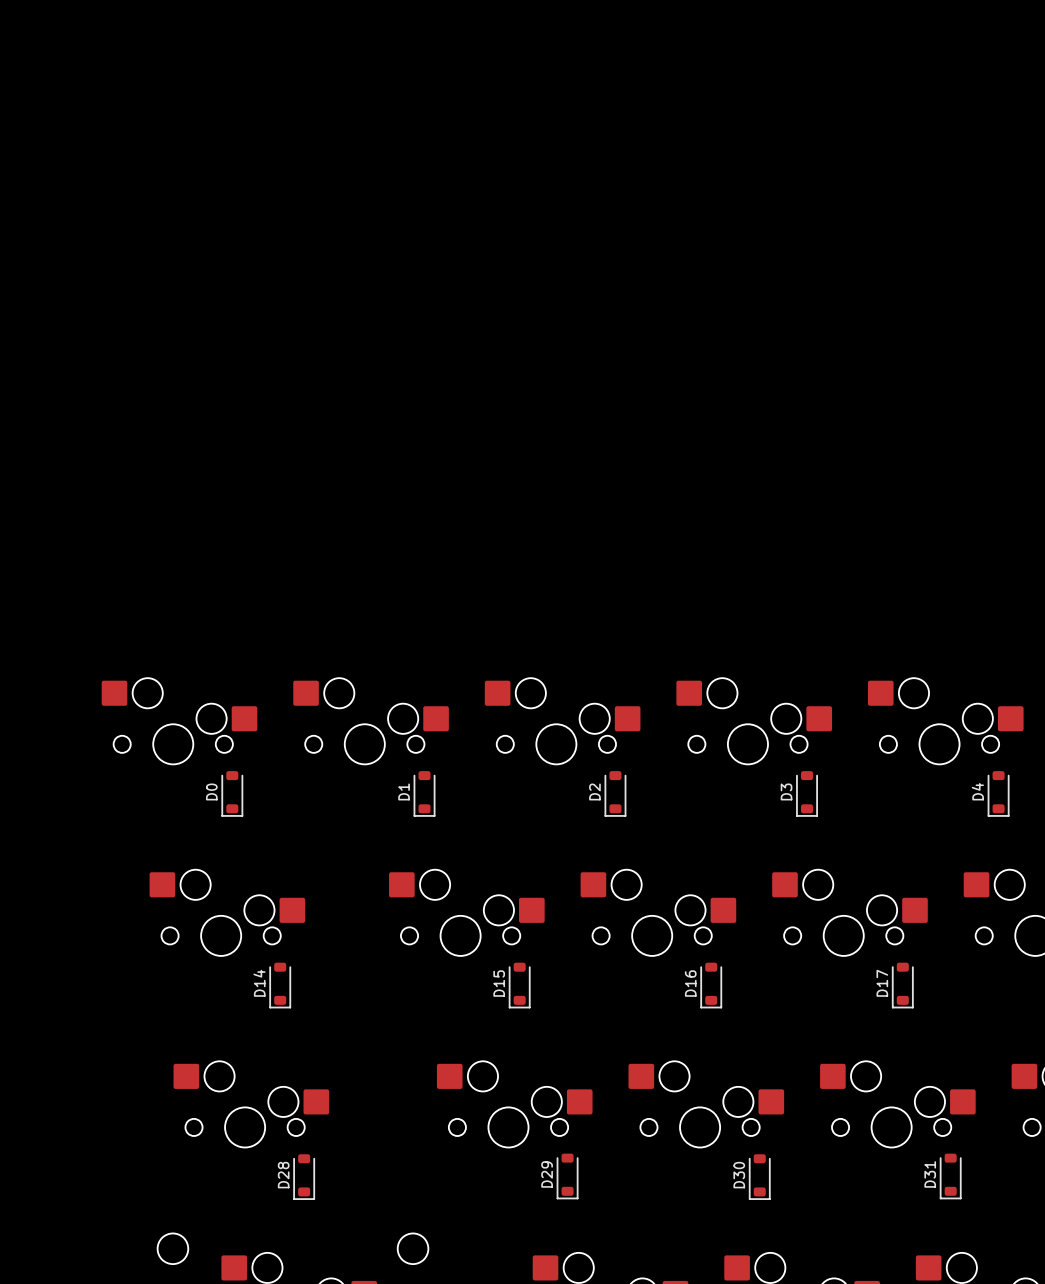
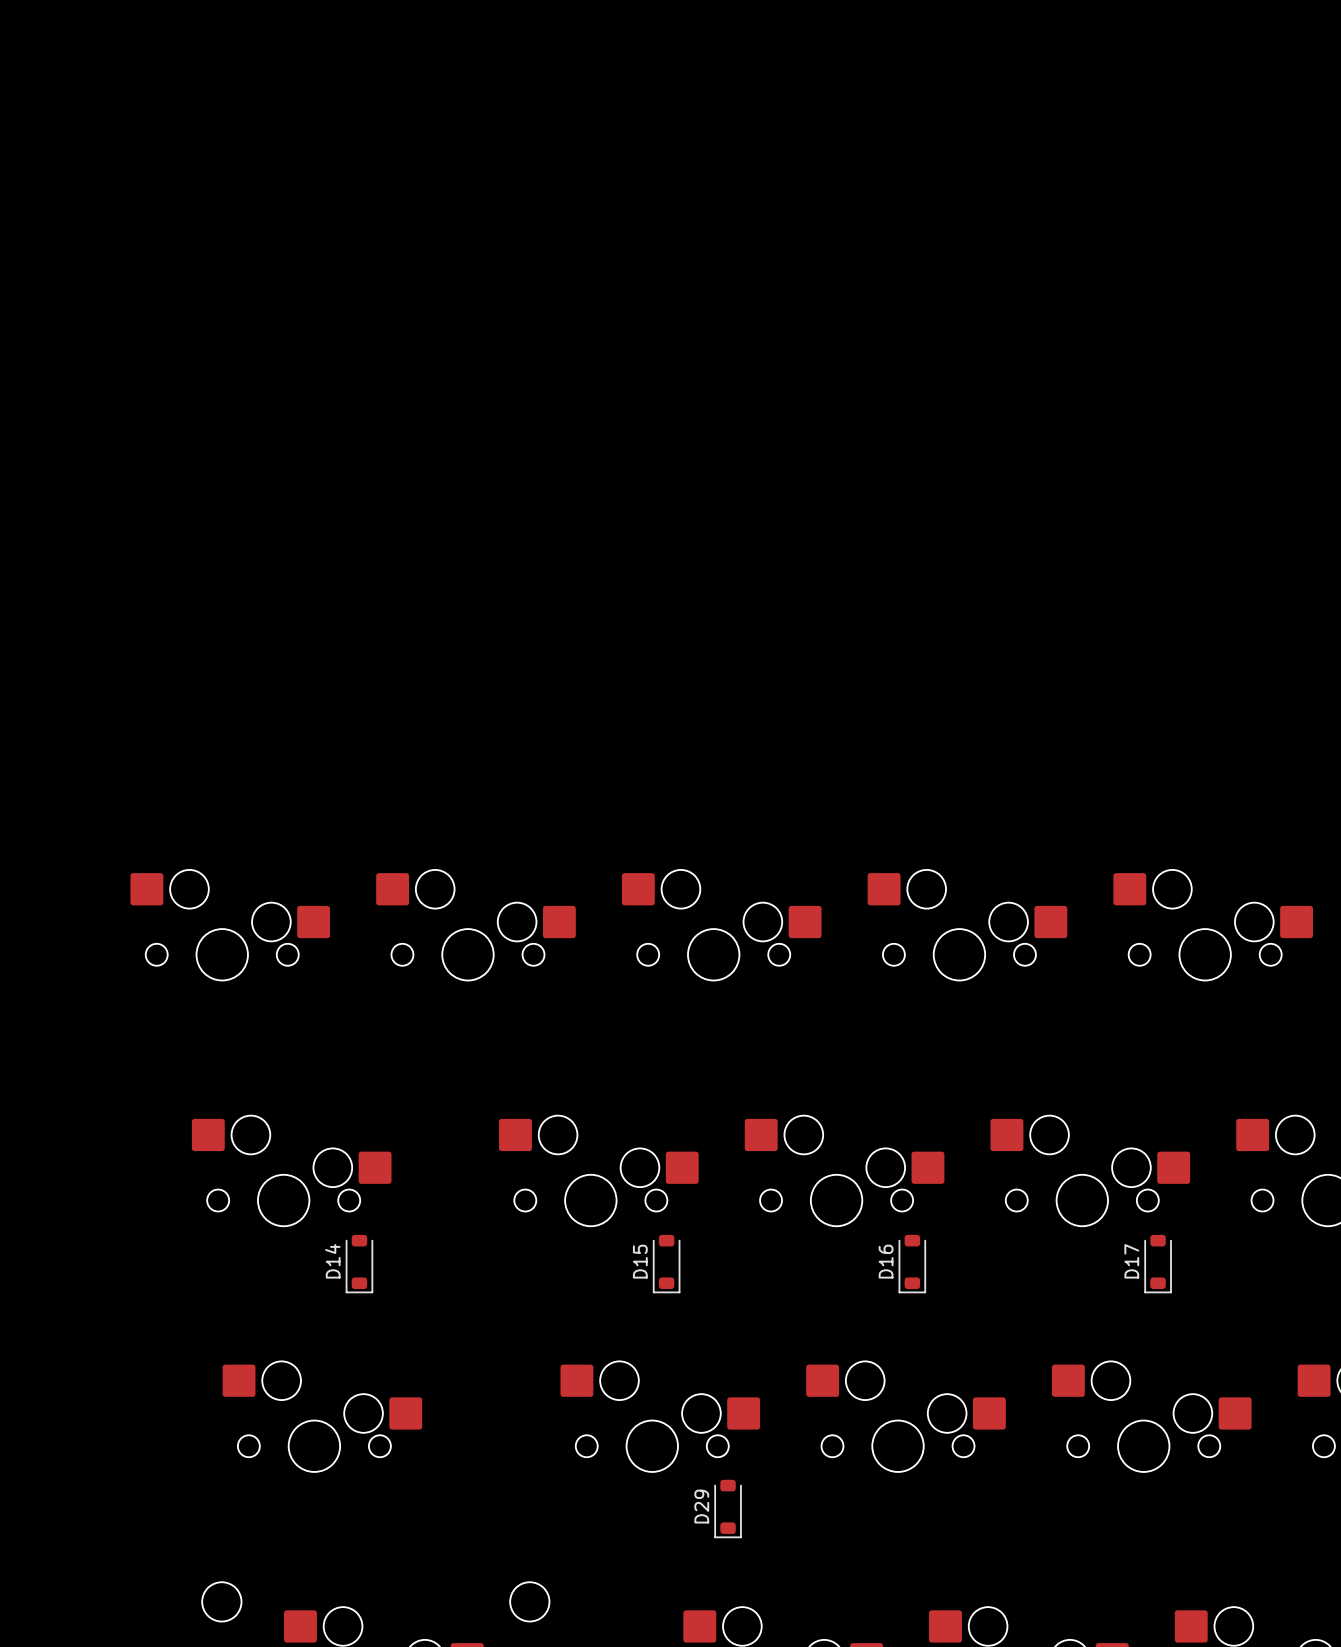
D0: (232, 793) -> none
D1: (424, 793) -> none
D2: (615, 793) -> none
D3: (807, 793) -> none
D4: (998, 793) -> none
D28: (304, 1176) -> none
D30: (759, 1176) -> none
D31: (950, 1176) -> none

